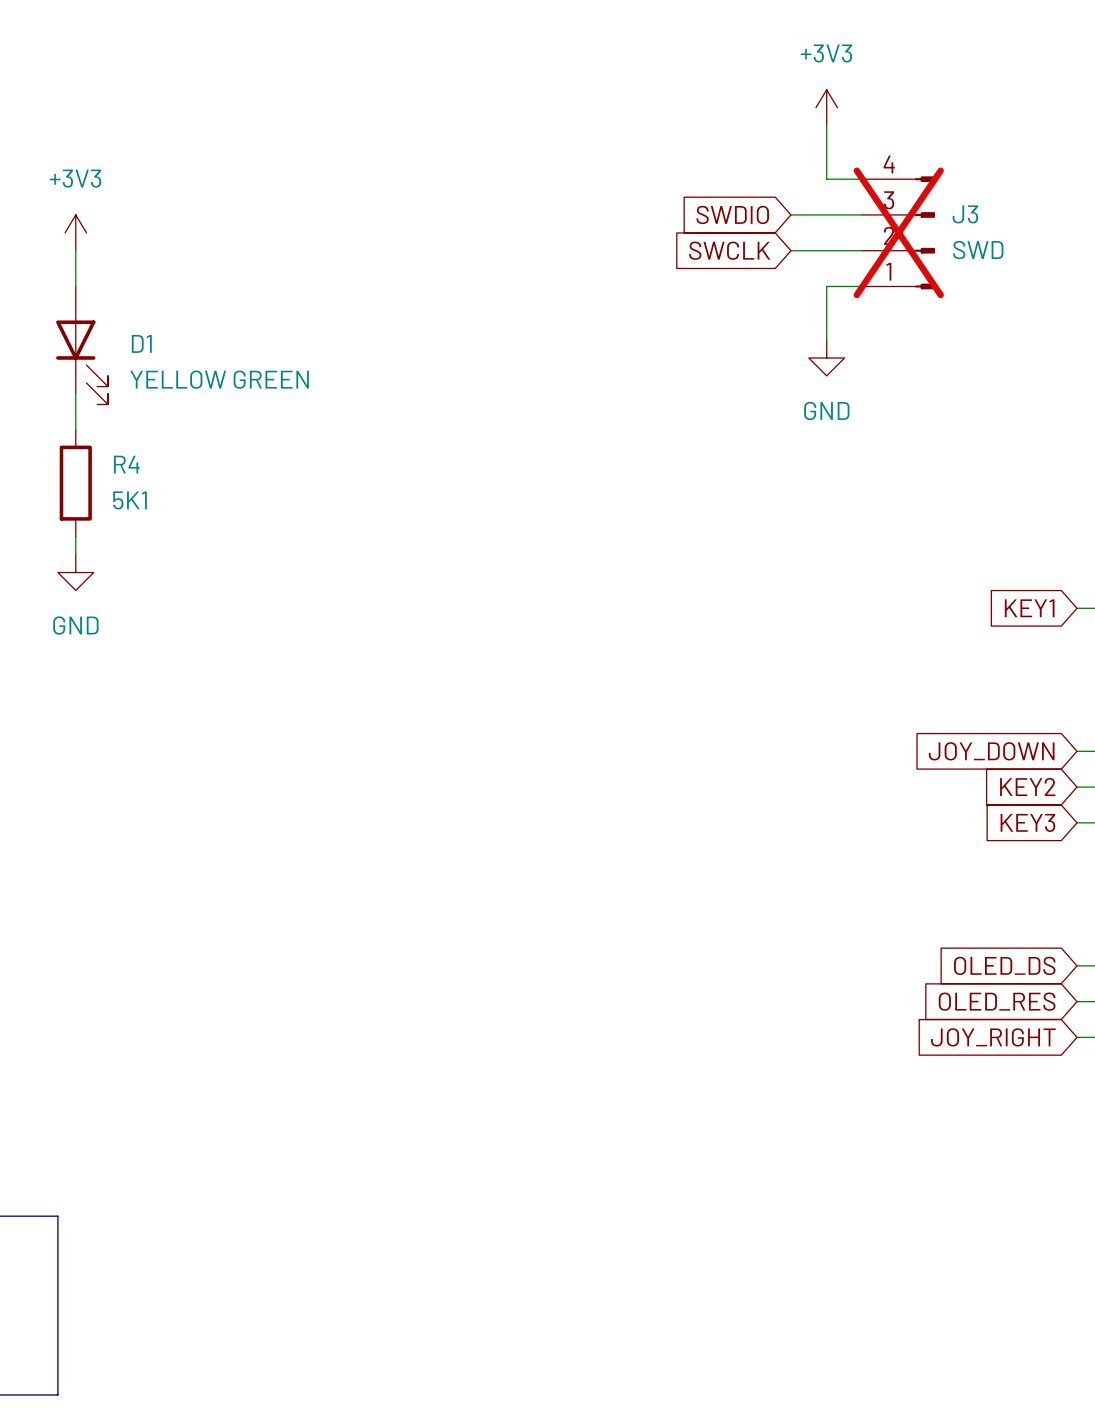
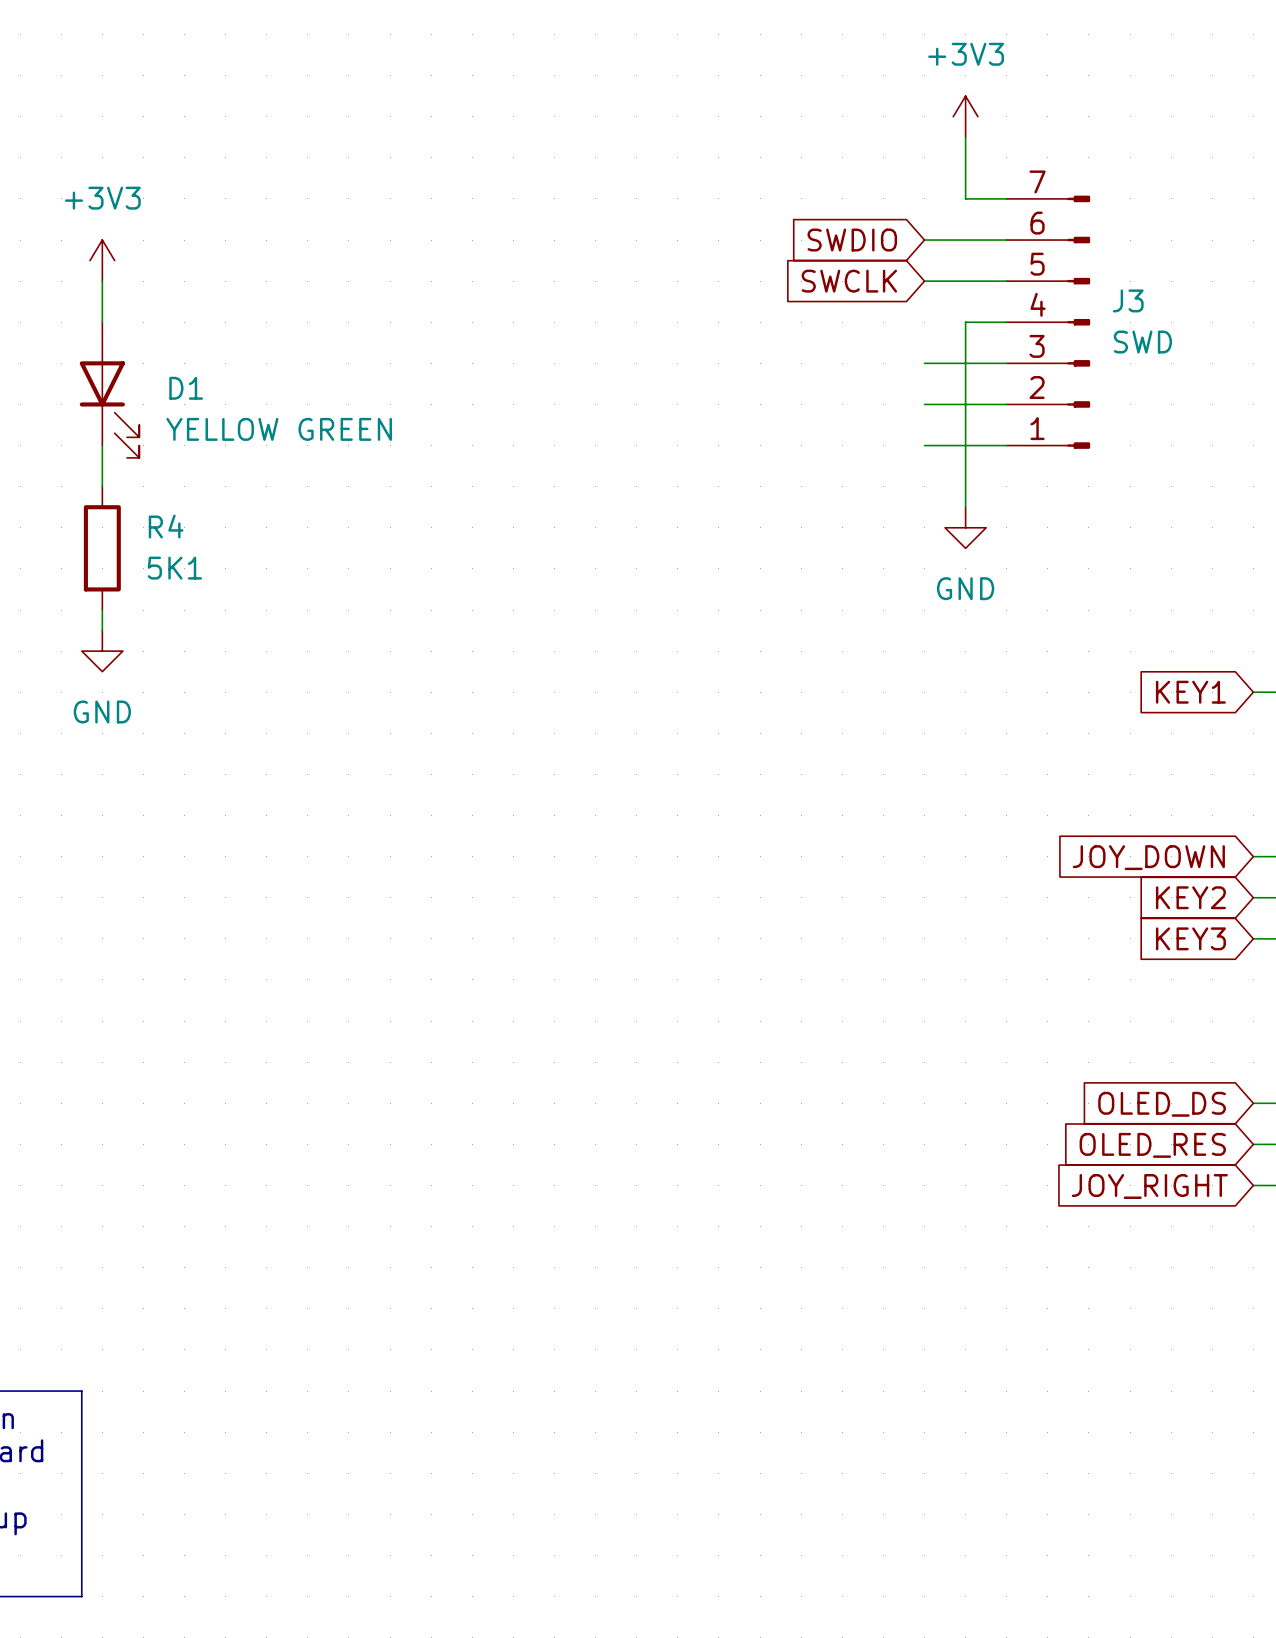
J3 symbol: [862, 176, 936, 290] -> [1006, 195, 1091, 449]
J3 do-not-place cross: (898, 232) -> none
wire: none -> (924, 363) (1006, 363)
wire: none -> (965, 383) (965, 507)
wire: none -> (924, 404) (1006, 404)
power symbol position: GND (826, 357) -> GND (965, 527)
wire: none -> (924, 445) (1006, 445)

